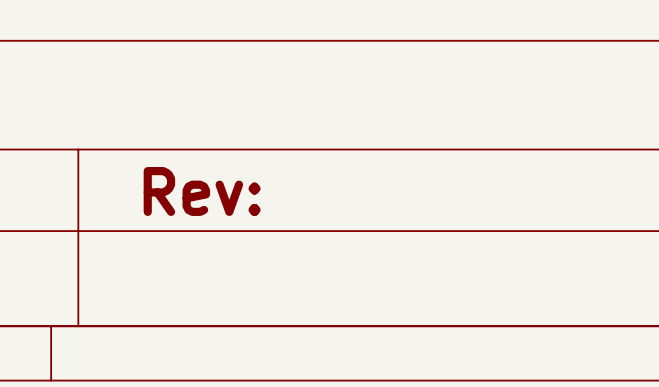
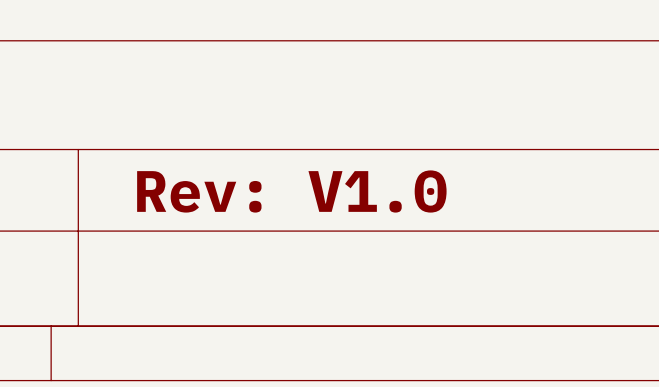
title block: Rev: (202, 191) -> Rev: V1.0 (291, 191)

